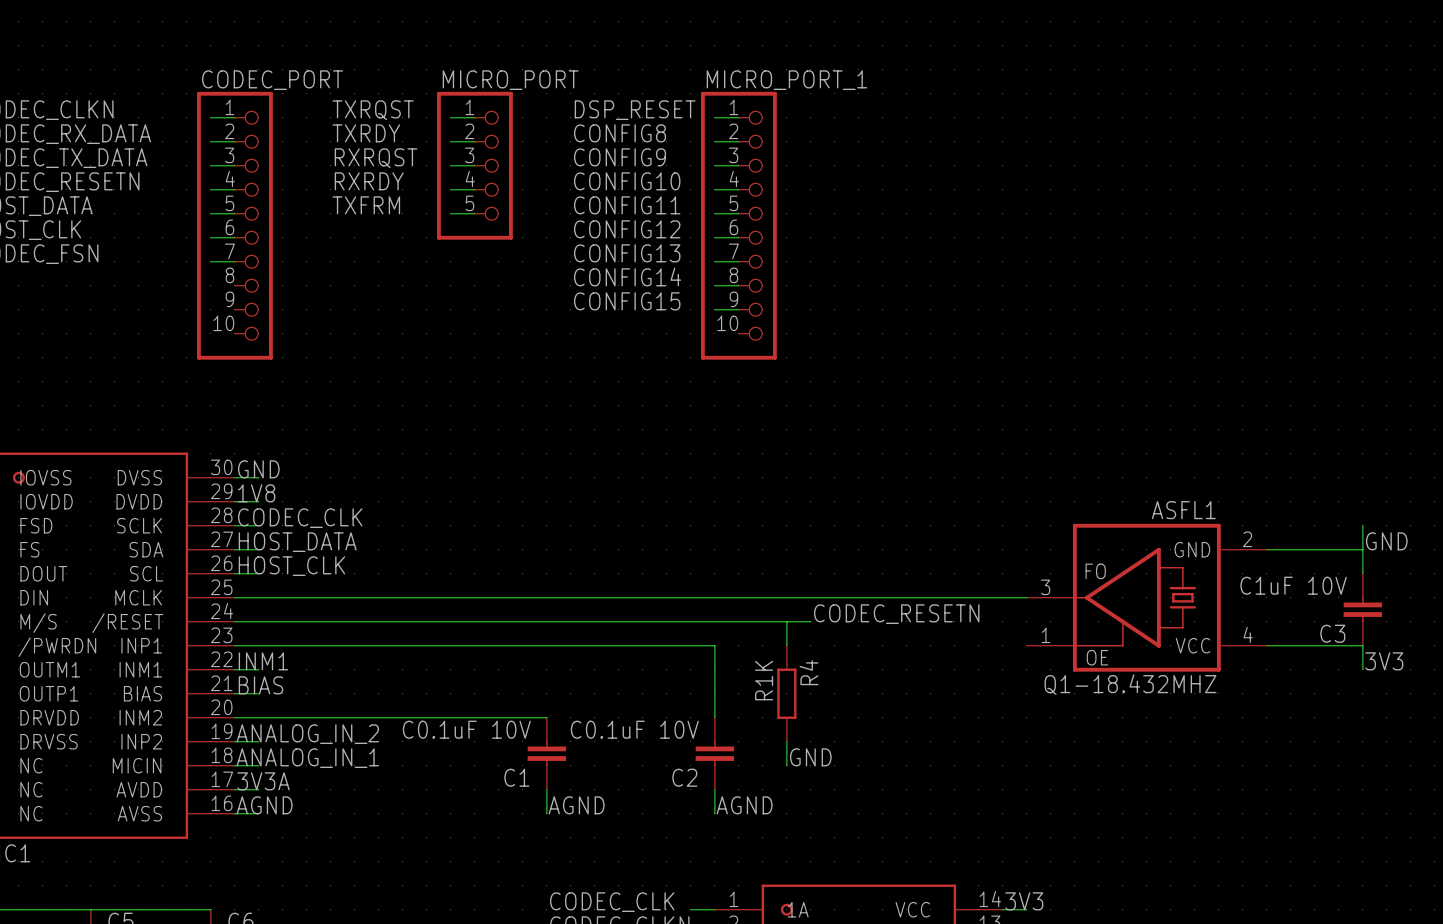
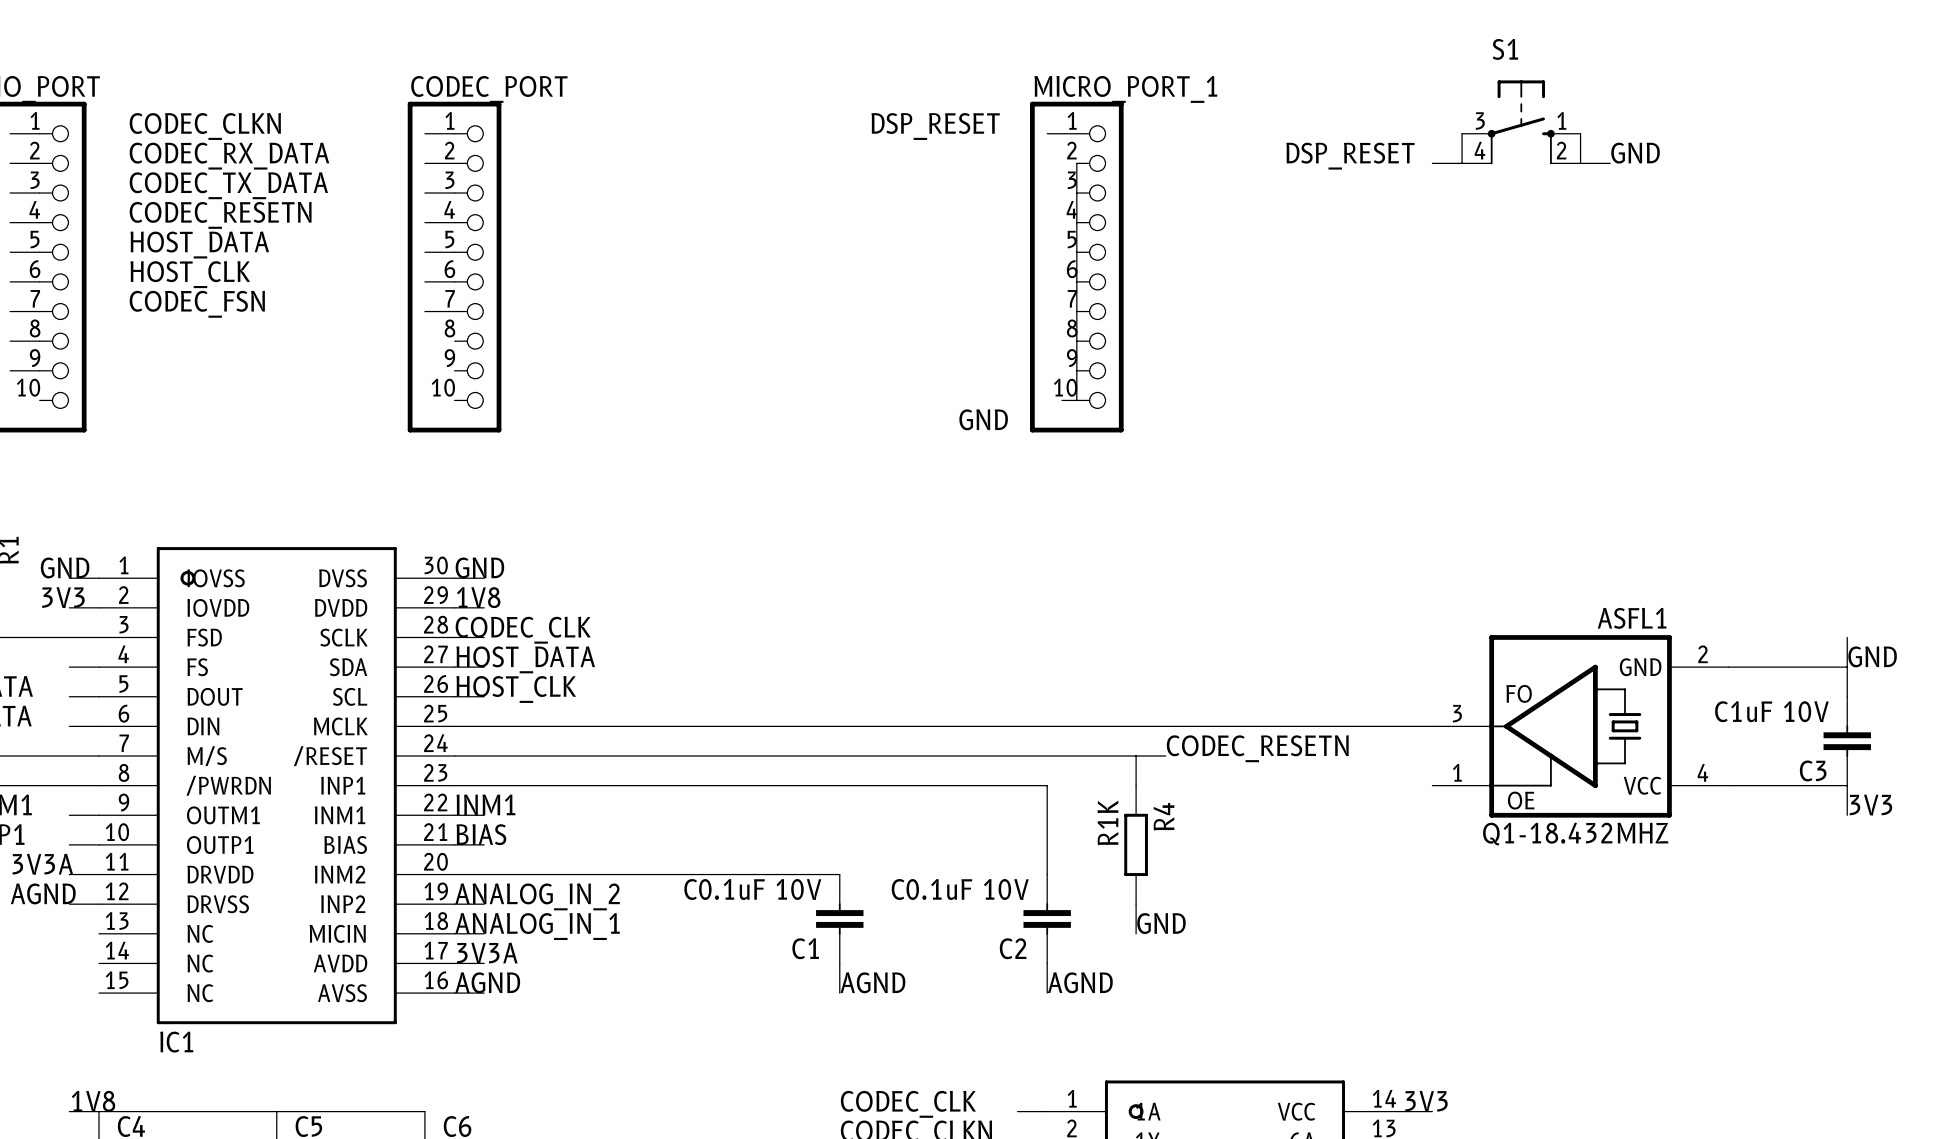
S1: none -> (1521, 122)
label: TXRQST (373, 110) -> none
wire: (450, 117) (474, 117) -> none
wire: none -> (1462, 133) (1462, 163) (1432, 163)
wire: none -> (1580, 133) (1580, 163) (1610, 163)
label: TXRDY (366, 133) -> none
label: CONFIG8 (620, 133) -> none
label: none -> GND (1635, 153)
label: none -> DSP_RESET (1350, 156)
wire: (450, 141) (474, 141) -> none
wire: (714, 141) (738, 141) -> (1062, 400) (1076, 400) (1076, 163)
label: CONFIG9 (620, 157) -> none
label: RXRQST (376, 158) -> none
wire: (450, 165) (474, 165) -> none
MICRO_PORT: (474, 165) -> none
wire: (714, 165) (738, 165) -> none
label: RXRDY (369, 181) -> none
label: CONFIG10 (627, 181) -> none
wire: (450, 189) (474, 189) -> none
wire: (714, 189) (738, 189) -> none
label: TXFRM (366, 205) -> none
label: CONFIG11 (627, 205) -> none
wire: (450, 213) (474, 213) -> none
wire: (714, 213) (738, 213) -> none
label: CONFIG12 (627, 229) -> none
wire: (714, 237) (738, 237) -> none
label: CONFIG13 (627, 253) -> none
wire: (714, 261) (738, 261) -> none
label: CONFIG14 (627, 276) -> none
wire: (714, 285) (738, 285) -> none
label: CONFIG15 (627, 301) -> none
wire: (714, 309) (738, 309) -> none
label: none -> GND (983, 419)

